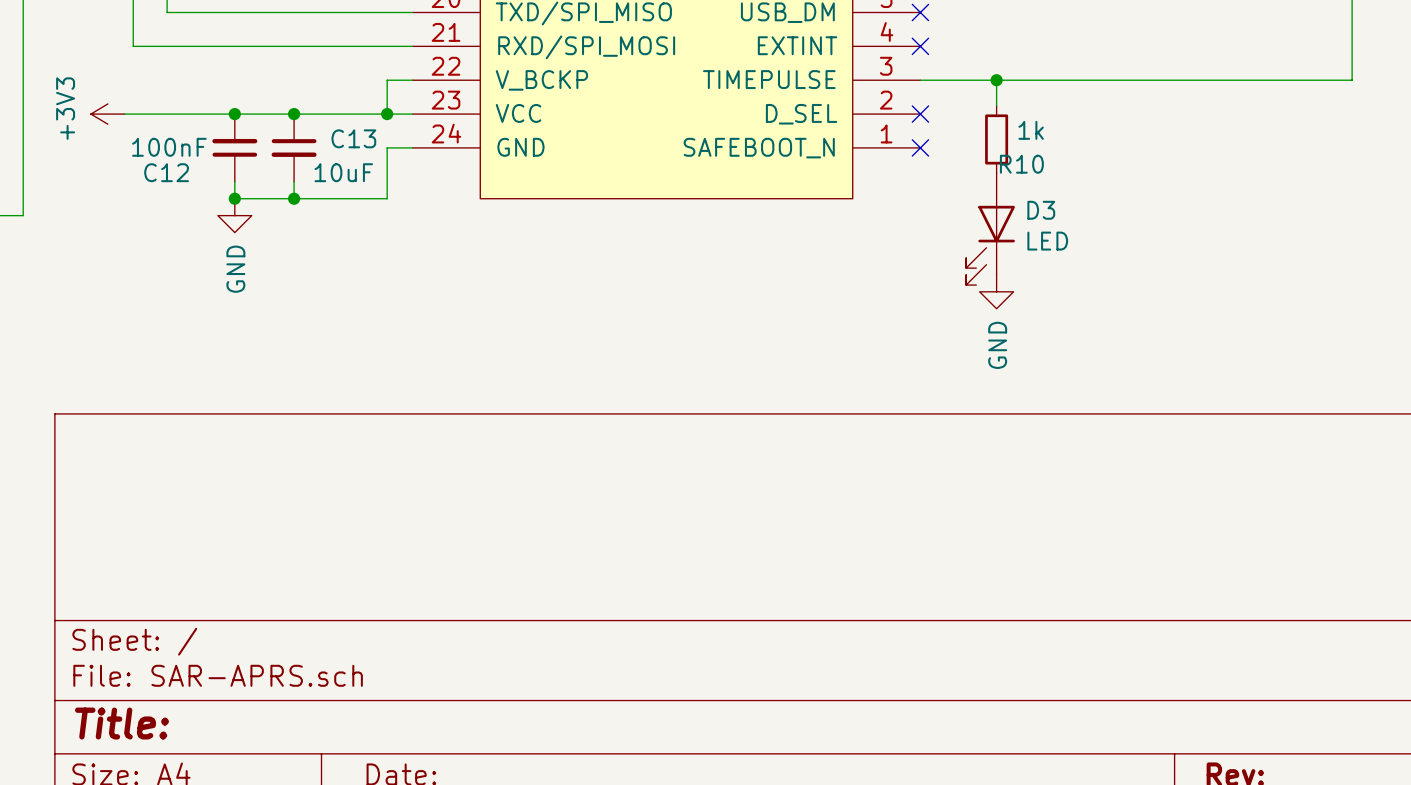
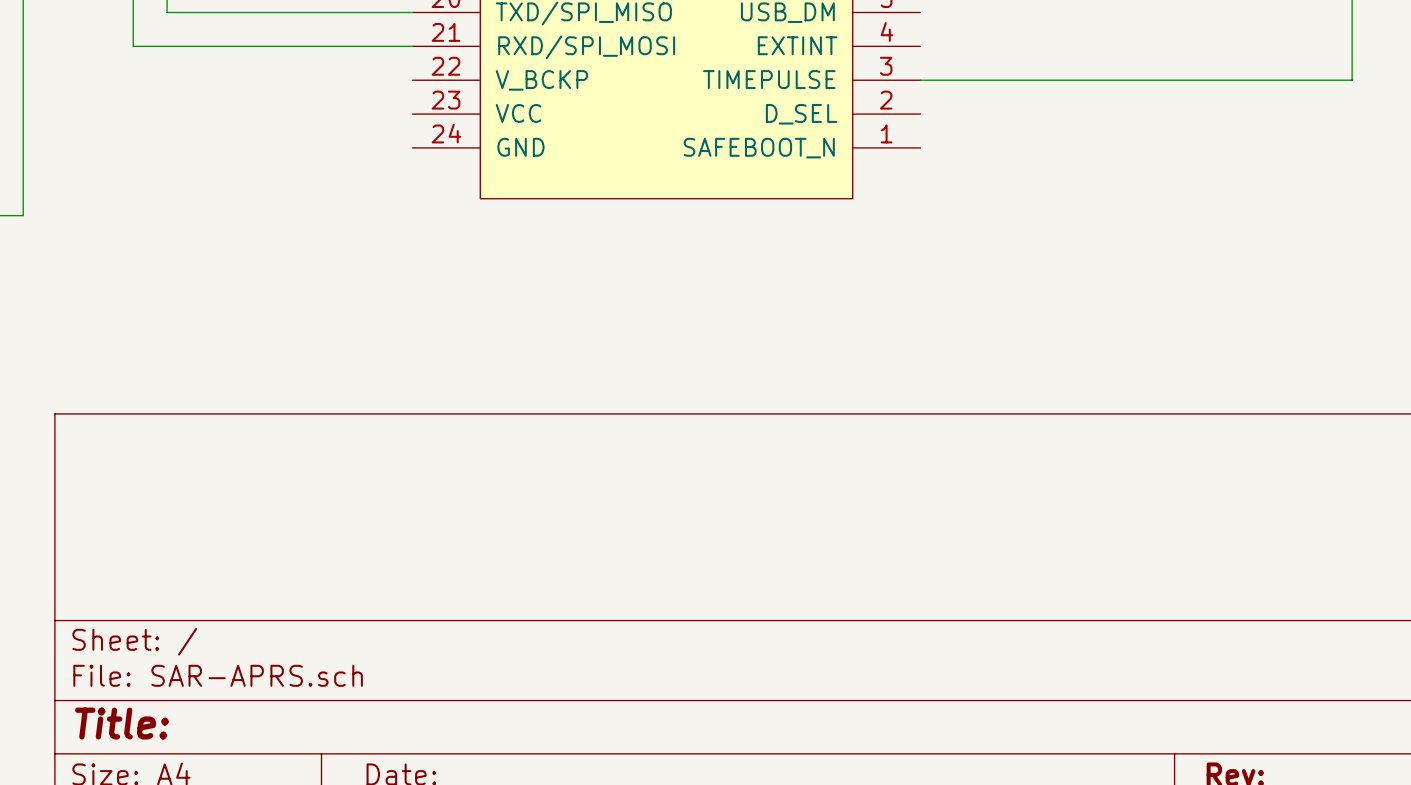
no-connect mark: (920, 12) -> none
no-connect mark: (920, 46) -> none
wire: (412, 80) (387, 80) (387, 114) -> none
wire: (996, 80) (996, 105) -> none
junction: (996, 80) -> none
power symbol: +3V3 (107, 114) -> none
wire: (124, 114) (412, 114) -> none
junction: (234, 114) -> none
junction: (294, 114) -> none
junction: (387, 114) -> none
no-connect mark: (920, 114) -> none
R10: 1k (996, 139) -> none
C12: 100nF (234, 147) -> none
C13: 10uF (294, 147) -> none
wire: (412, 147) (387, 147) (387, 198) (234, 198) (234, 181) -> none
no-connect mark: (920, 147) -> none
wire: (294, 181) (294, 198) -> none
junction: (234, 198) -> none
junction: (294, 198) -> none
power symbol: GND (234, 215) -> none
D3: LED (990, 229) -> none
power symbol: GND (996, 291) -> none

